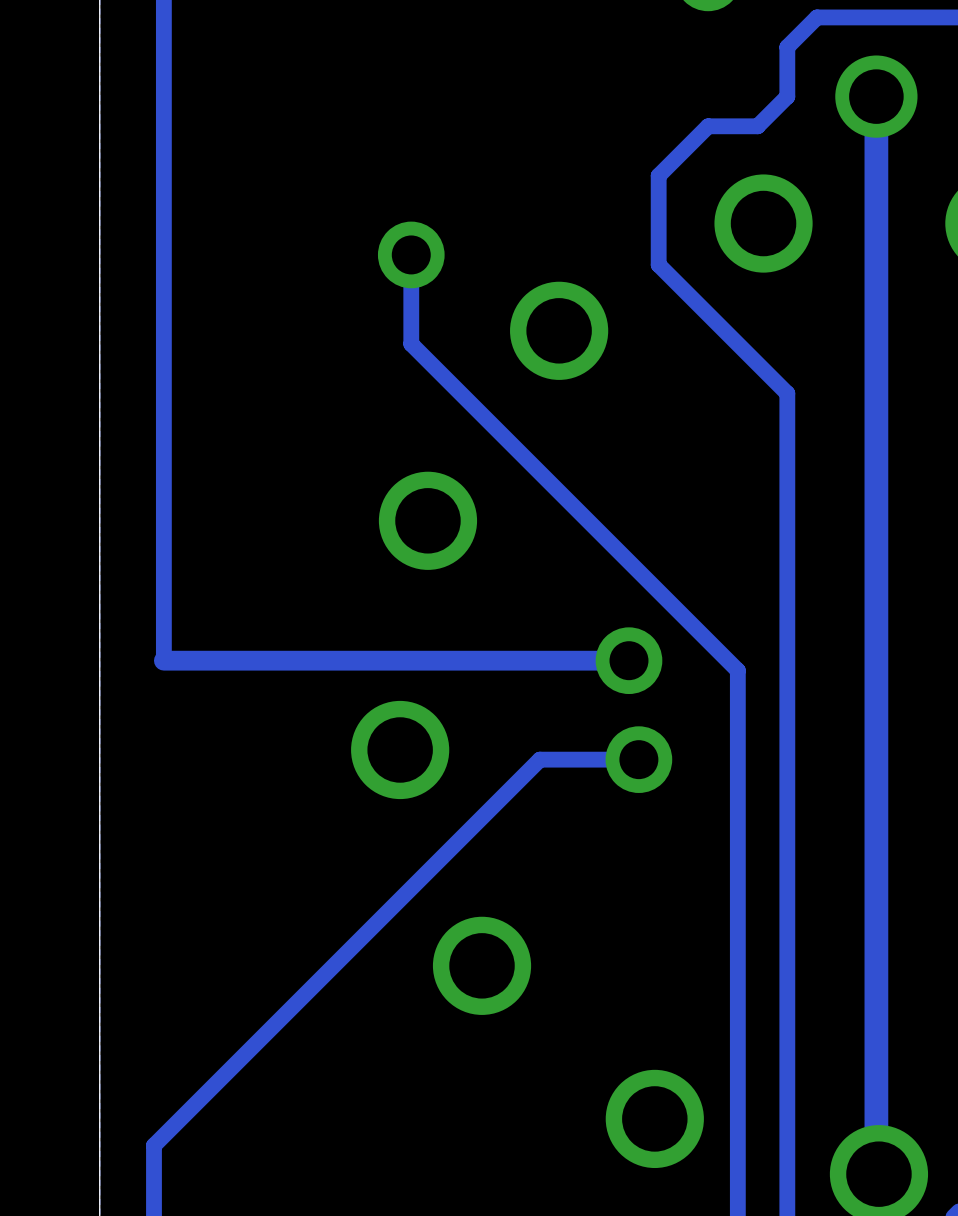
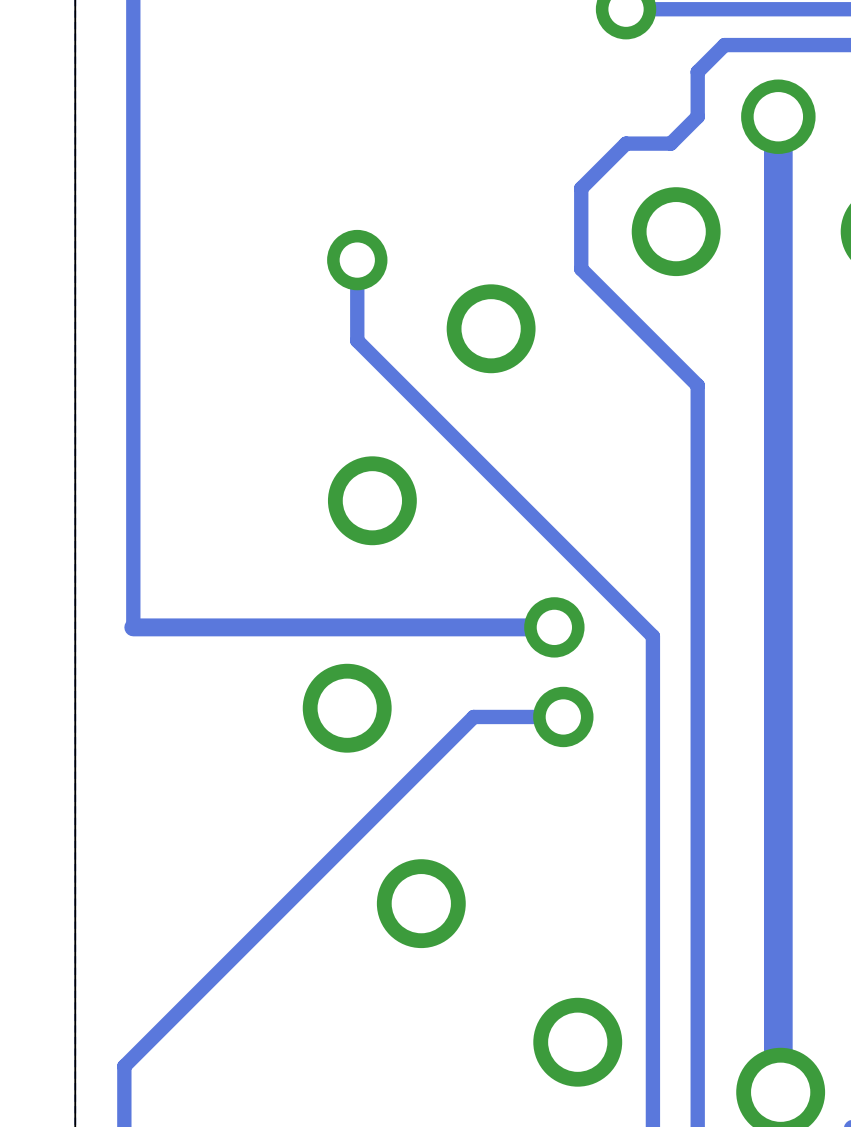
track width: thin (876, 96) (876, 1171) -> thick (778, 116) (778, 1089)

